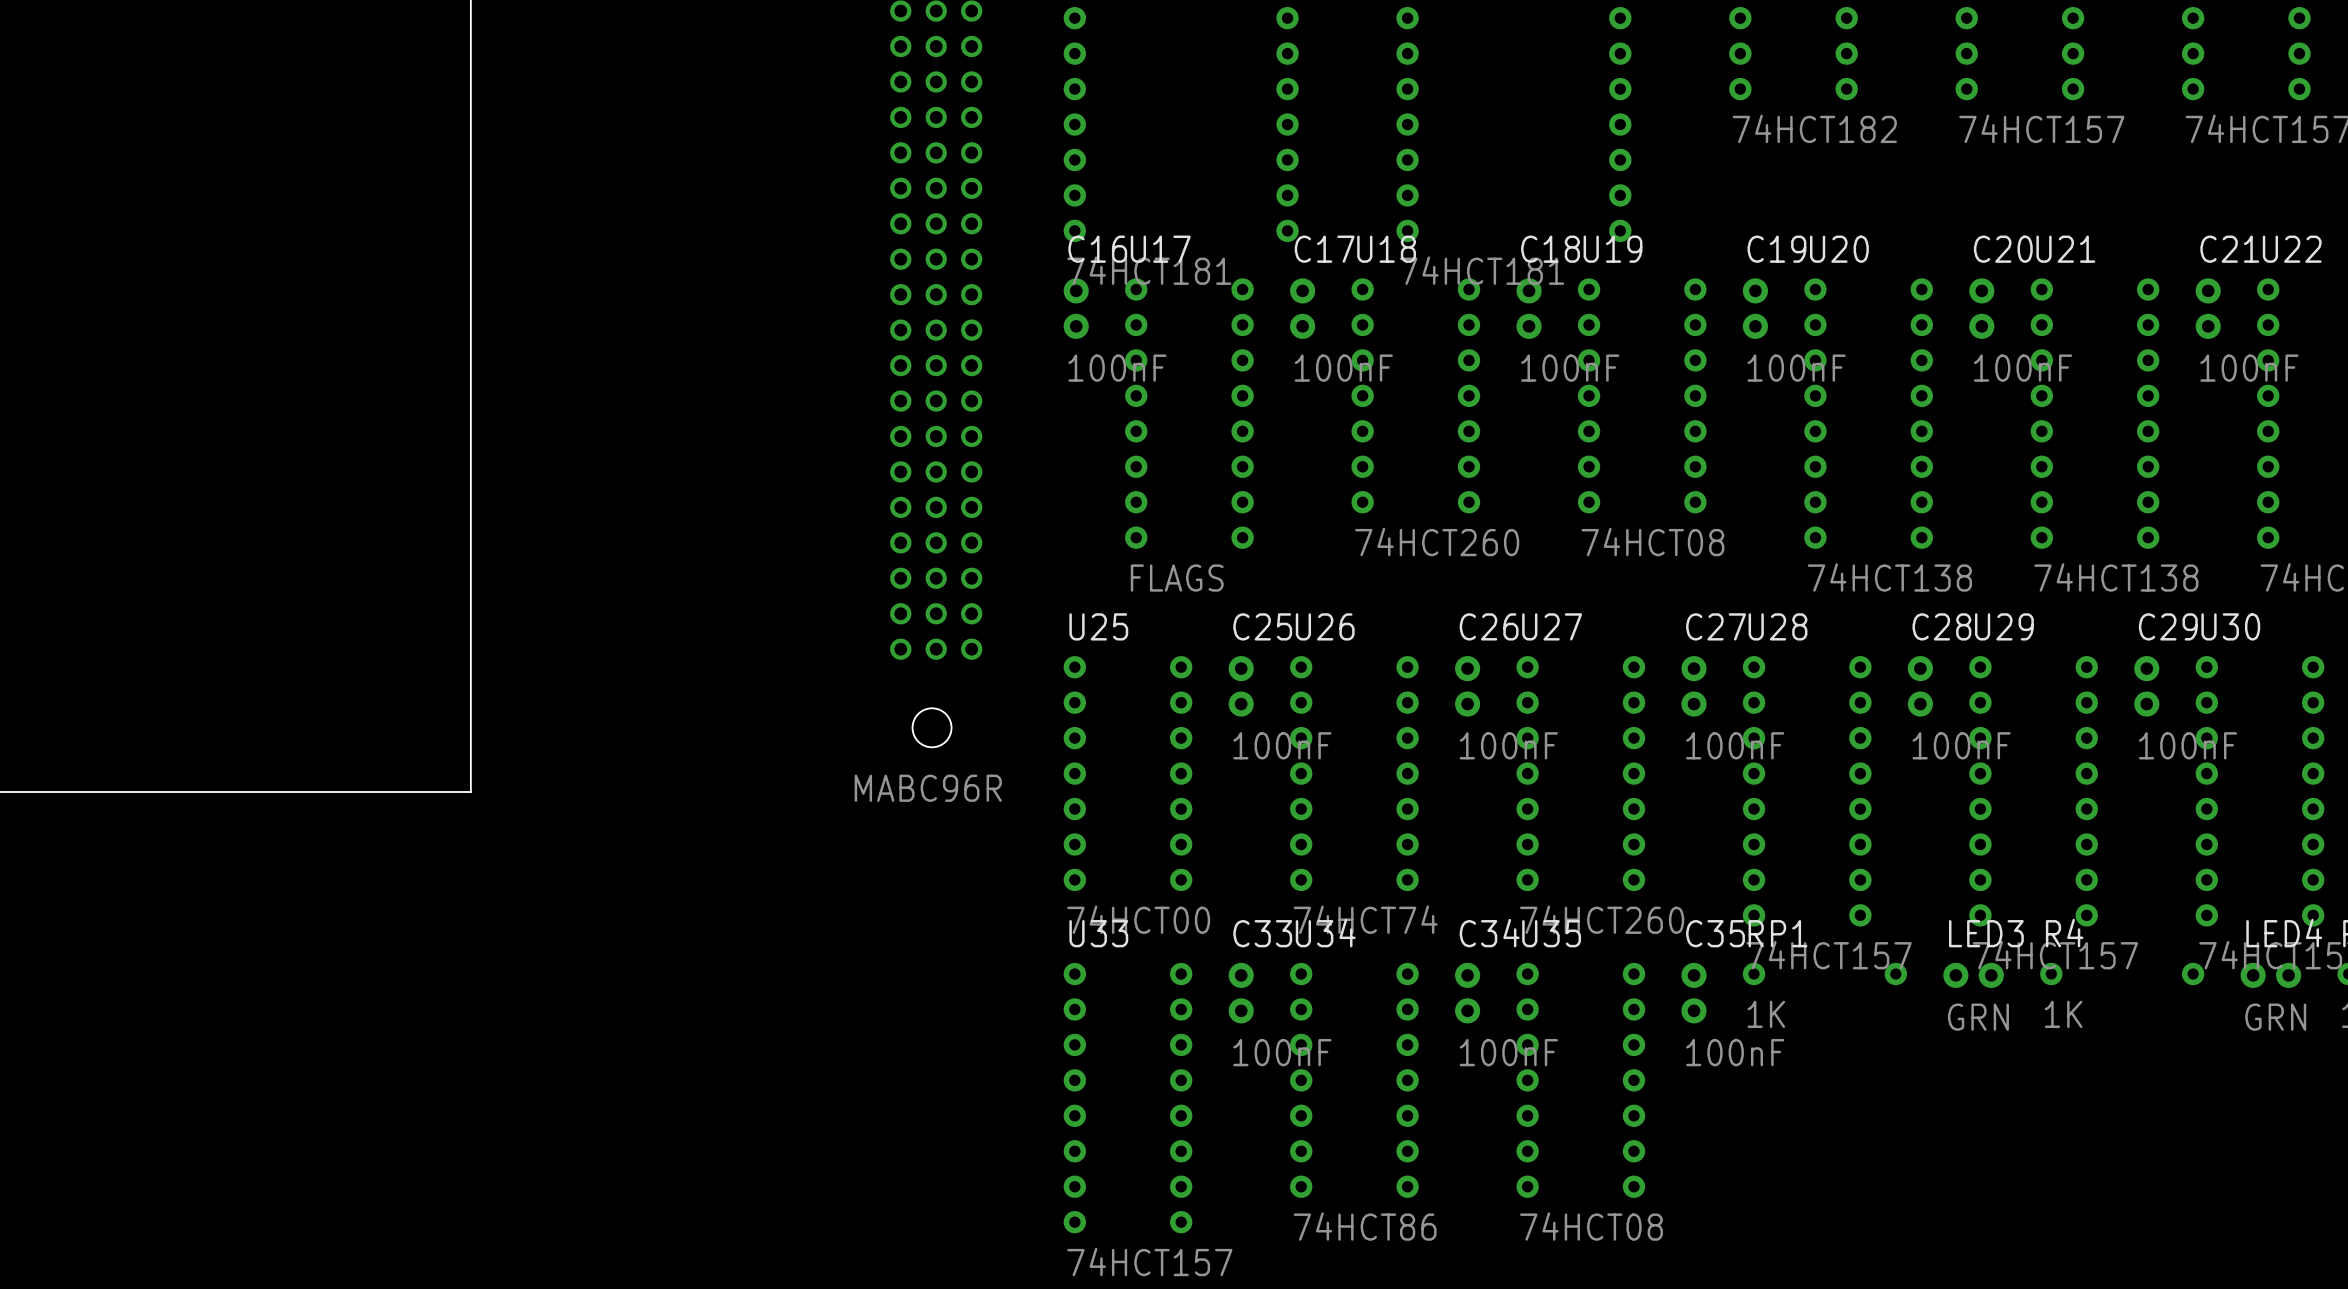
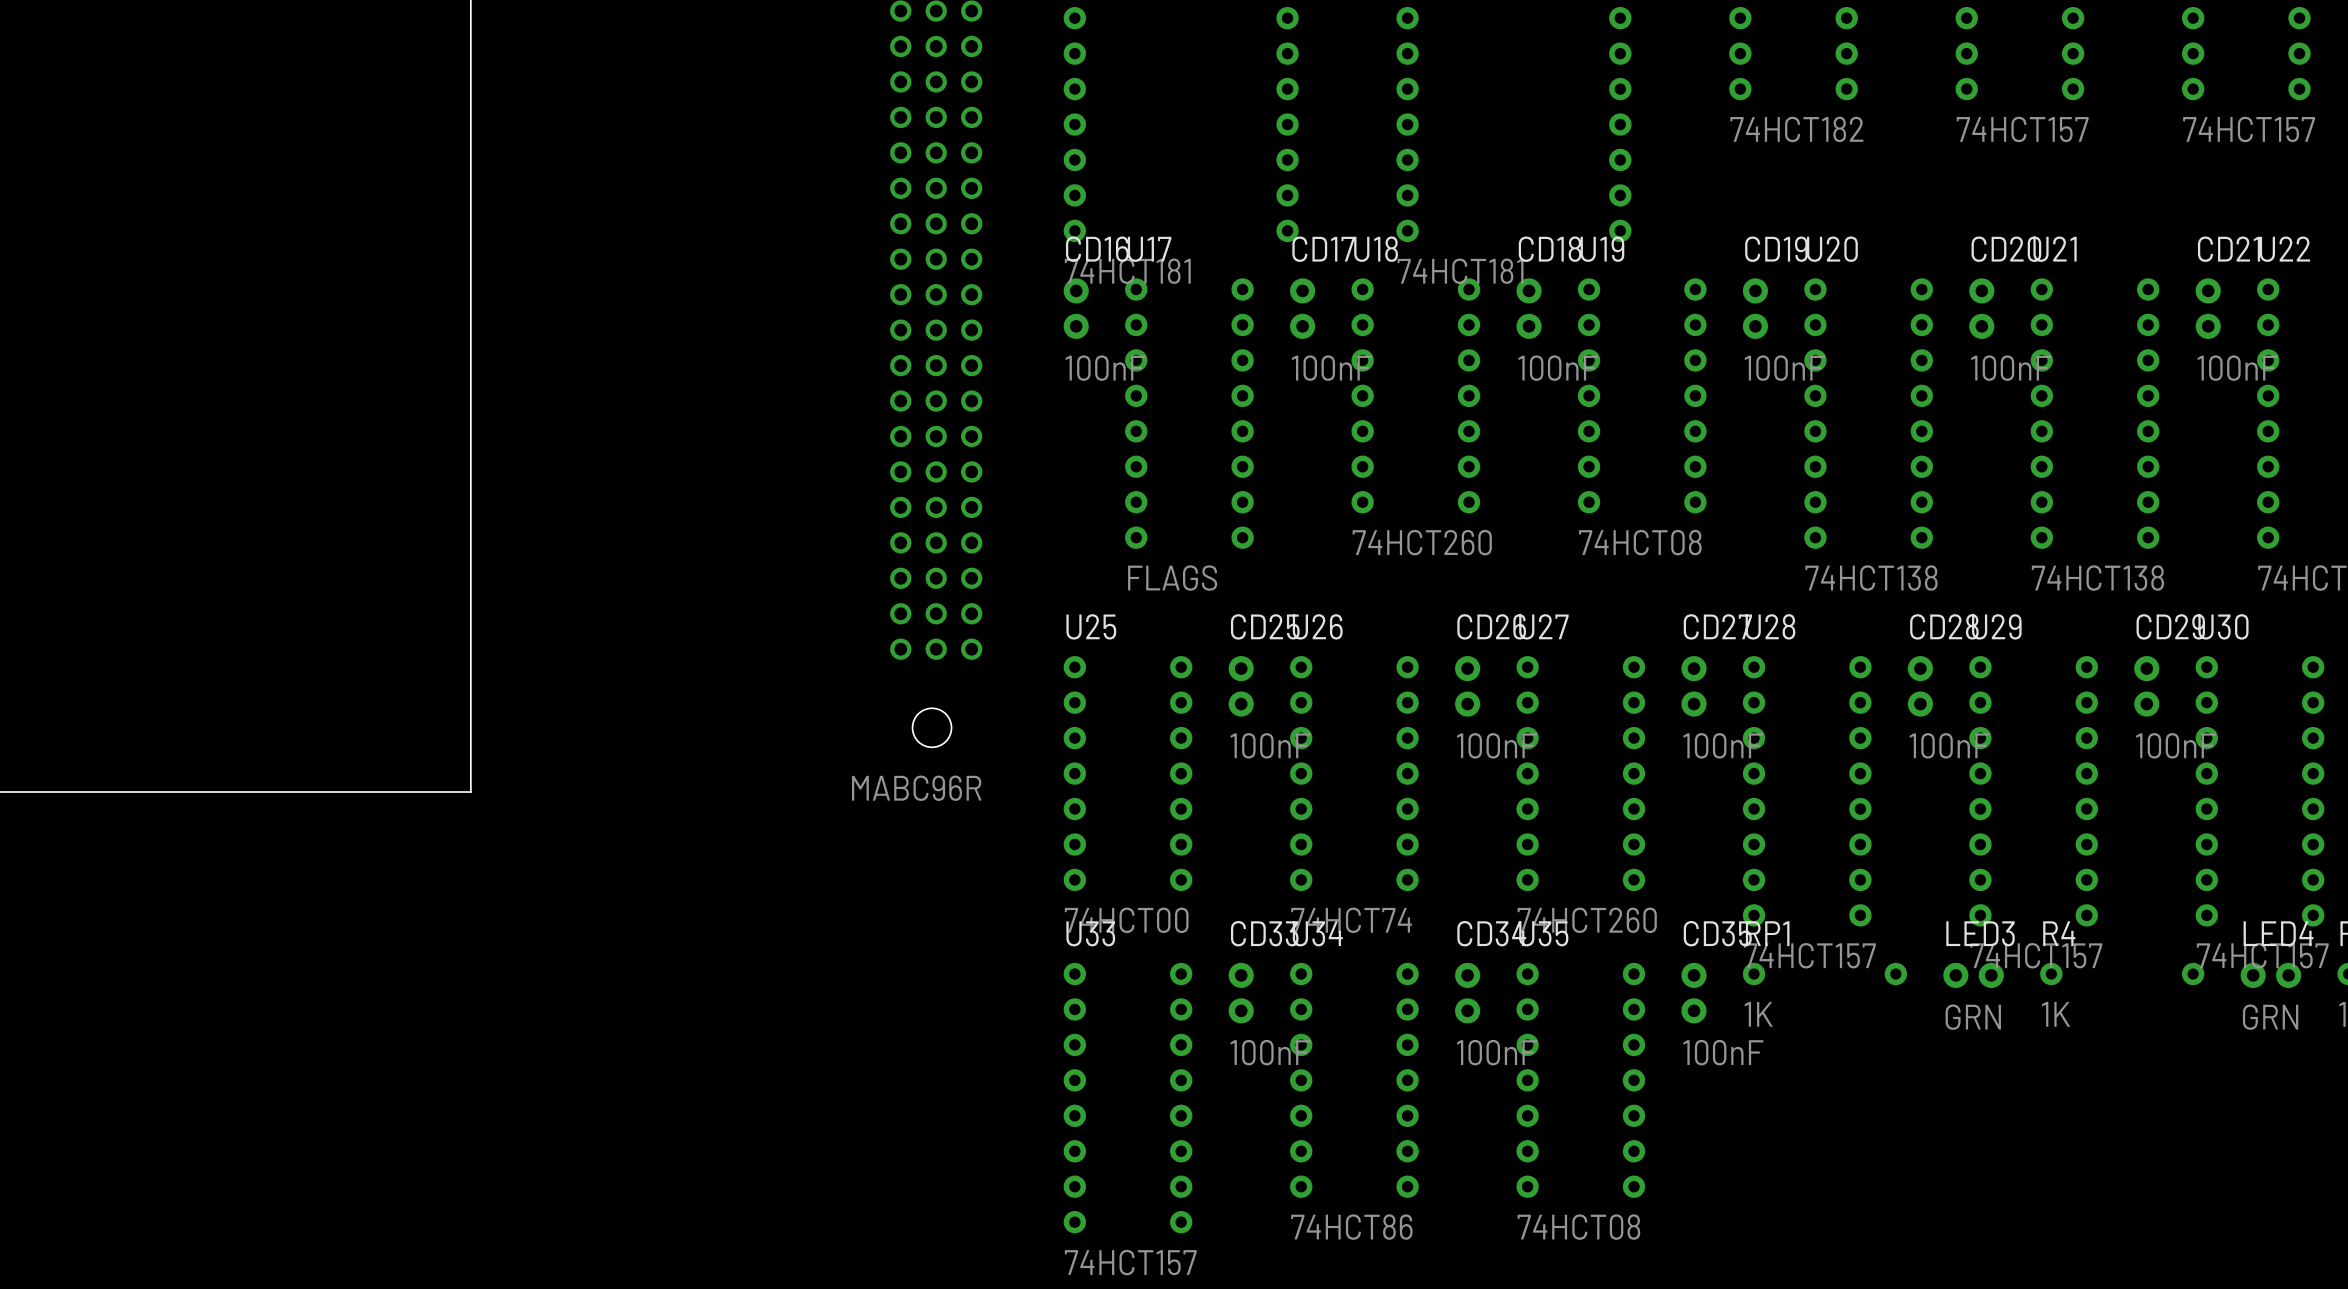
C16 name: C16 (1097, 249) -> CD16 (1097, 249)
C17 name: C17 (1324, 249) -> CD17 (1323, 249)
C18 name: C18 (1550, 249) -> CD18 (1550, 249)
C19 name: C19 (1776, 249) -> CD19 (1776, 249)
C20 name: C20 (2003, 249) -> CD20 (2006, 249)
C21 name: C21 (2229, 249) -> CD21 (2229, 249)
C25 name: C25 (1262, 626) -> CD25 (1265, 626)
C26 name: C26 (1489, 626) -> CD26 (1491, 626)
C27 name: C27 (1716, 626) -> CD27 (1717, 626)
C28 name: C28 (1941, 626) -> CD28 (1944, 626)
C29 name: C29 (2168, 626) -> CD29 (2170, 626)
C33 name: C33 (1262, 933) -> CD33 (1264, 933)
C34 name: C34 (1489, 933) -> CD34 (1491, 933)
C35 name: C35 (1715, 933) -> CD35 (1717, 933)

